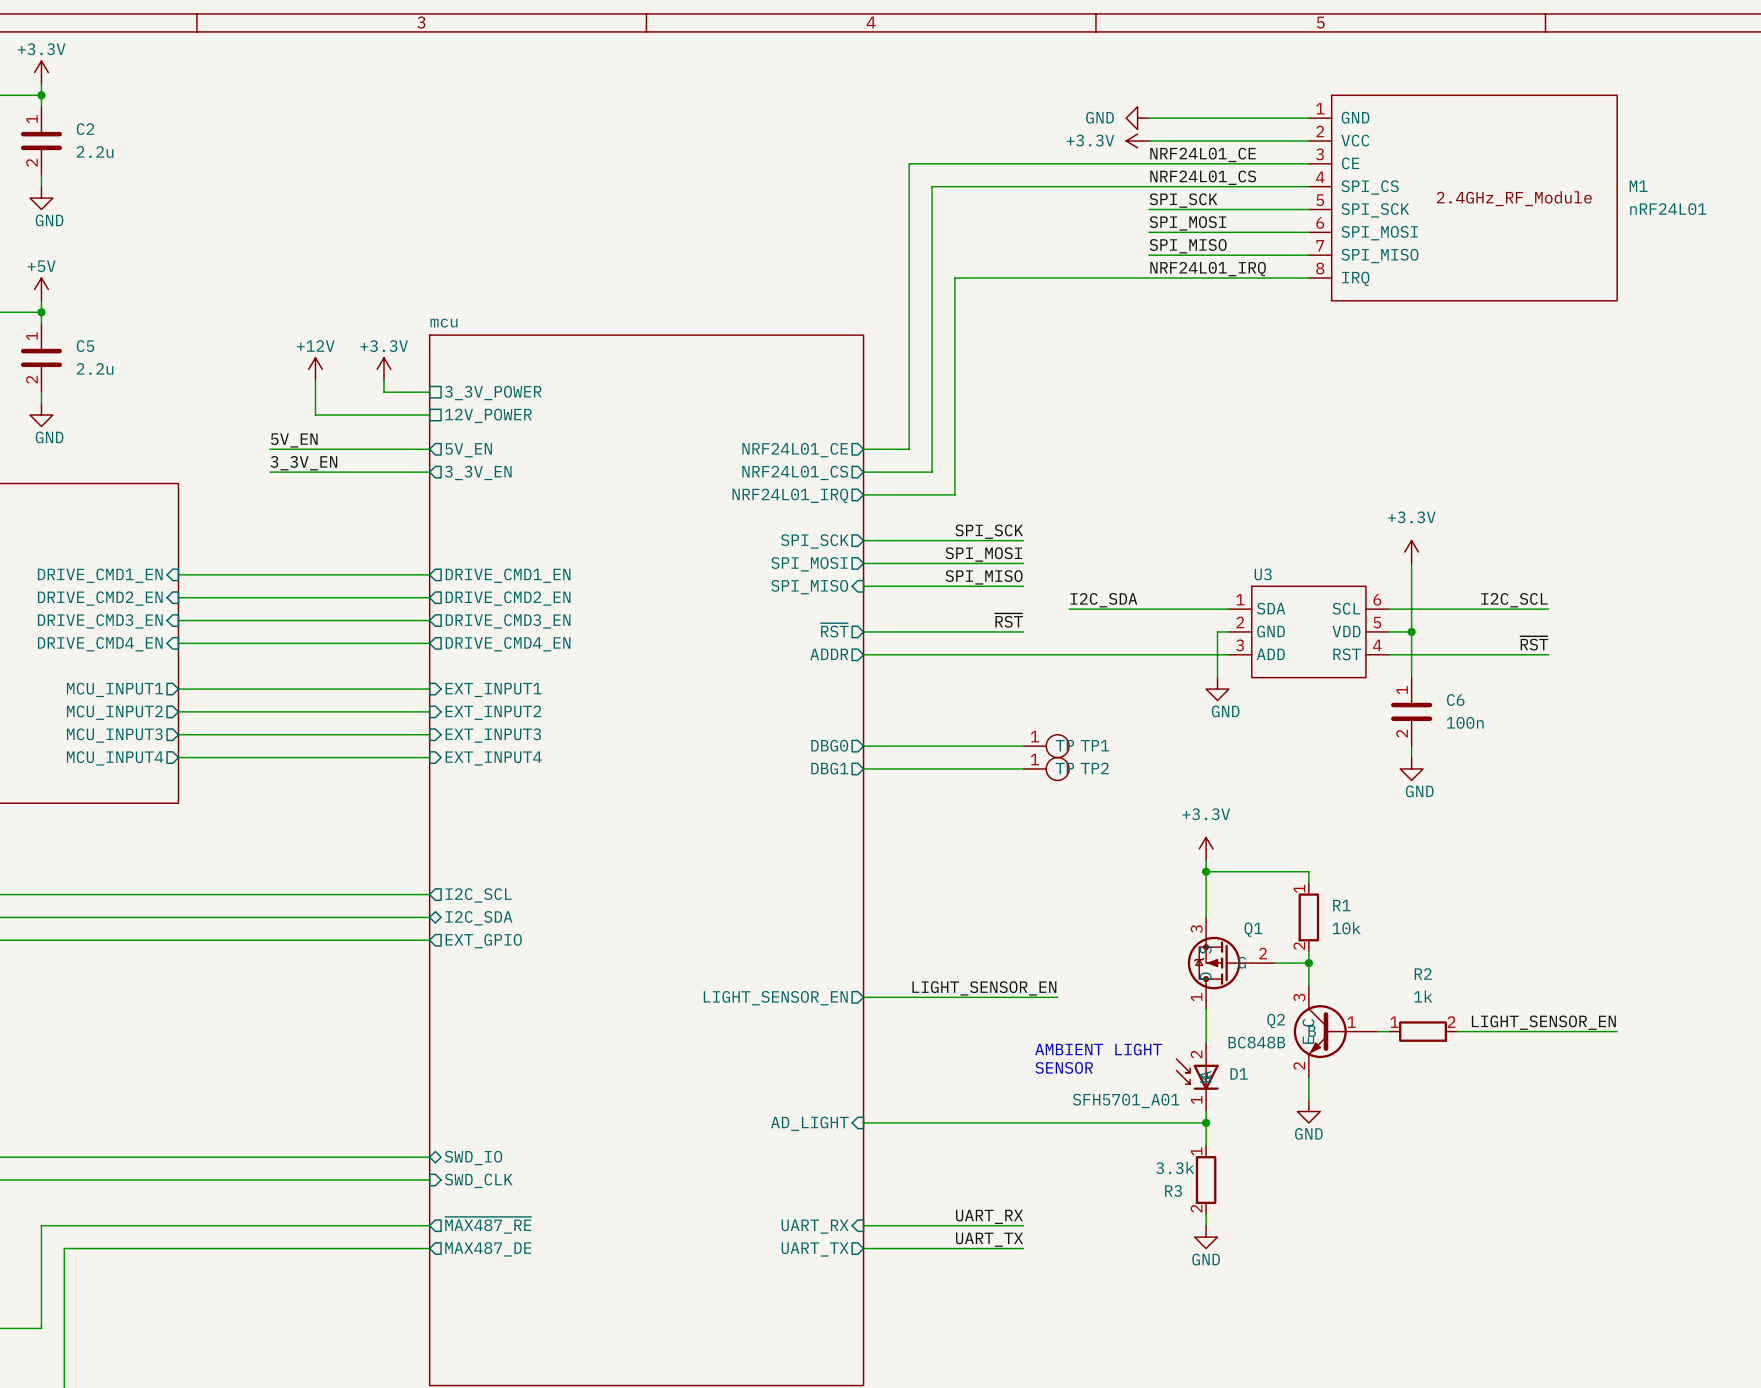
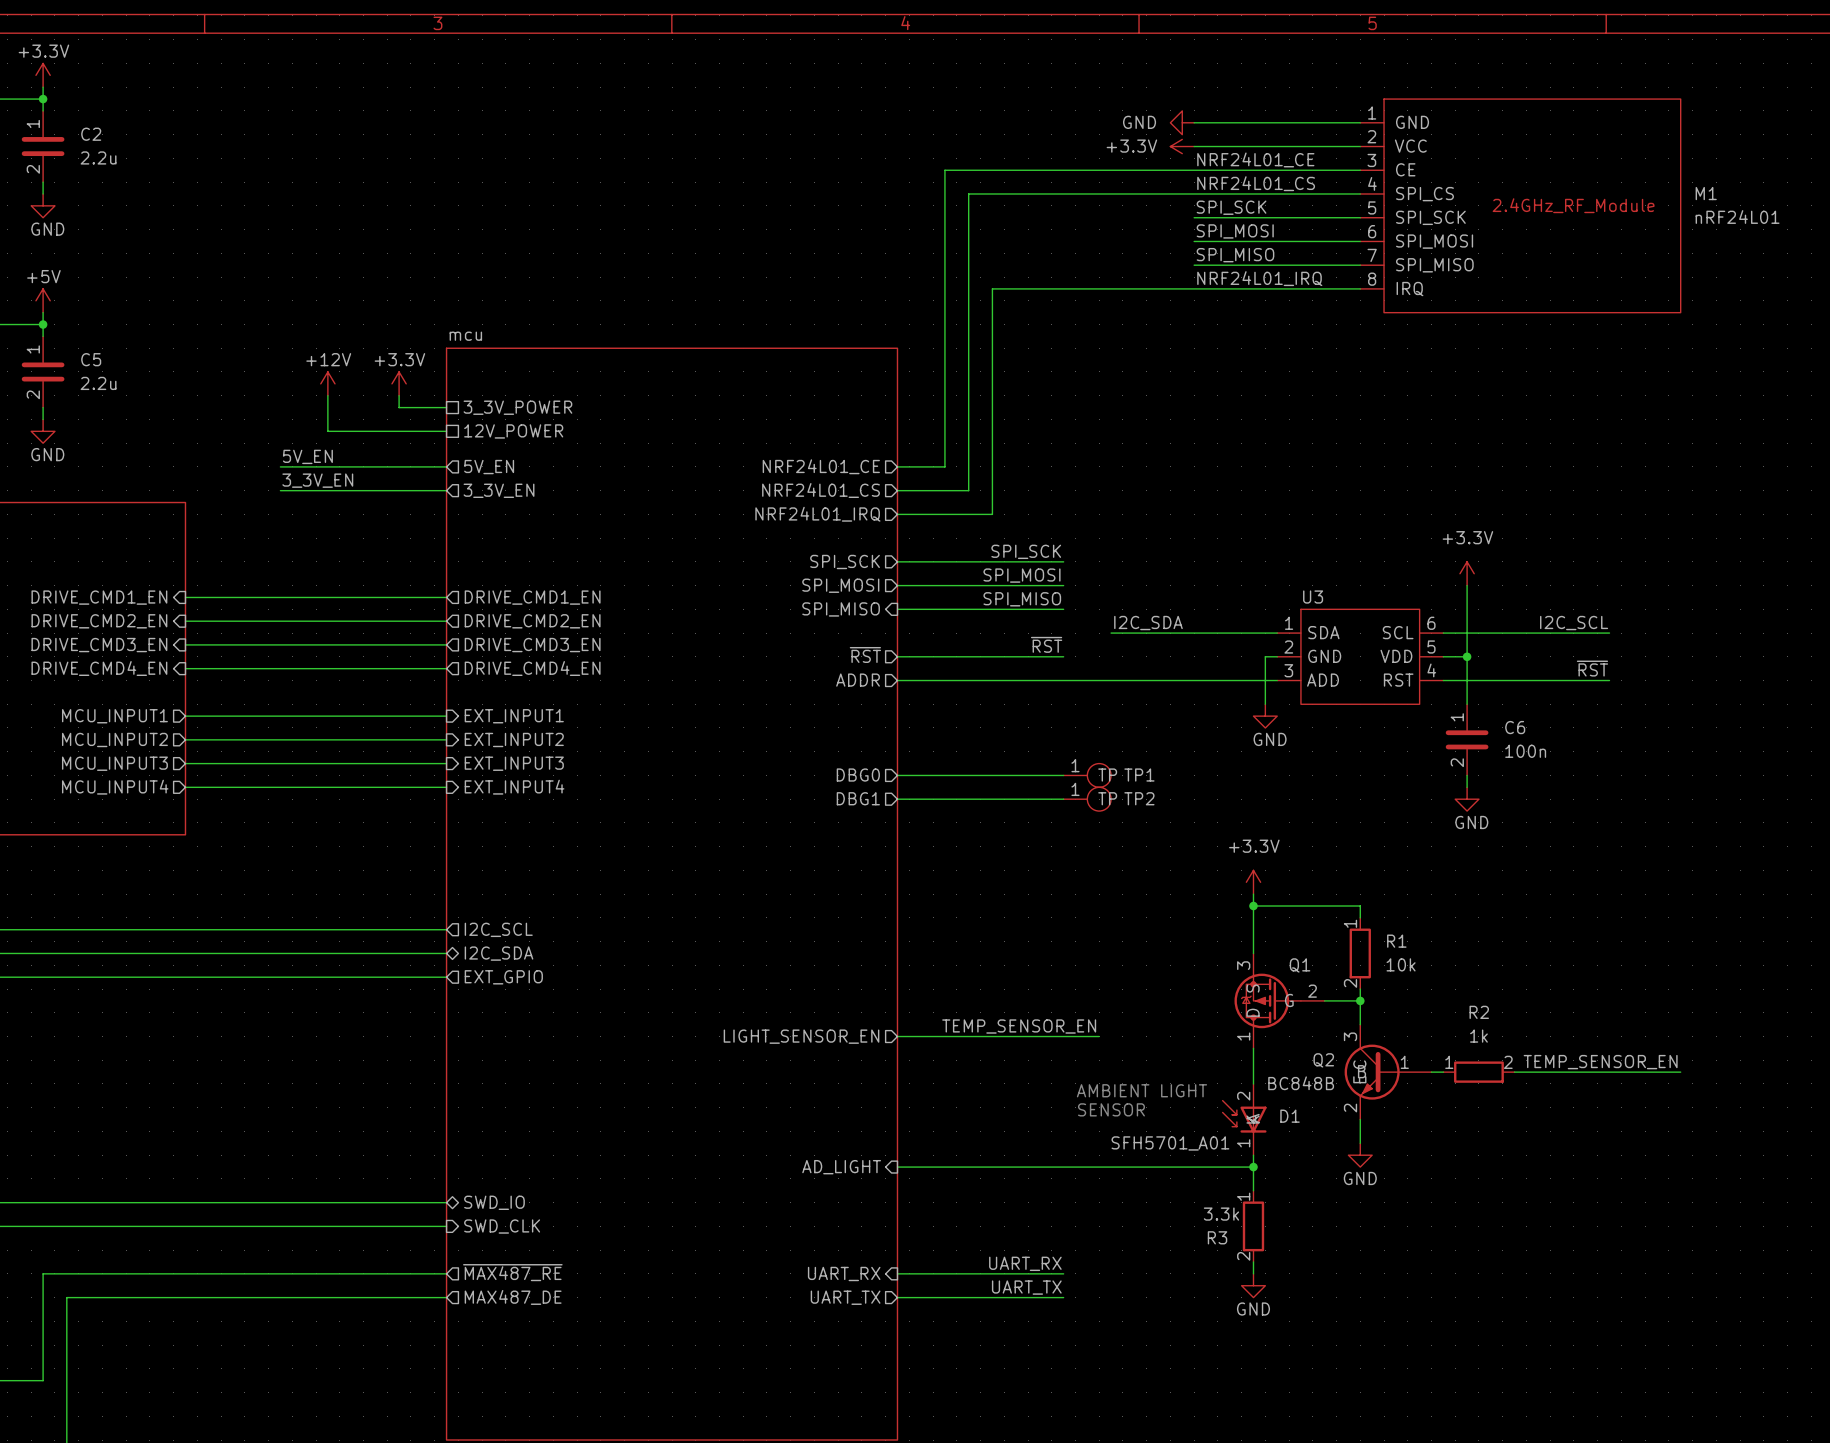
label: LIGHT_SENSOR_EN (984, 988) -> TEMP_SENSOR_EN (1019, 1026)
label: LIGHT_SENSOR_EN (1543, 1022) -> TEMP_SENSOR_EN (1600, 1062)

